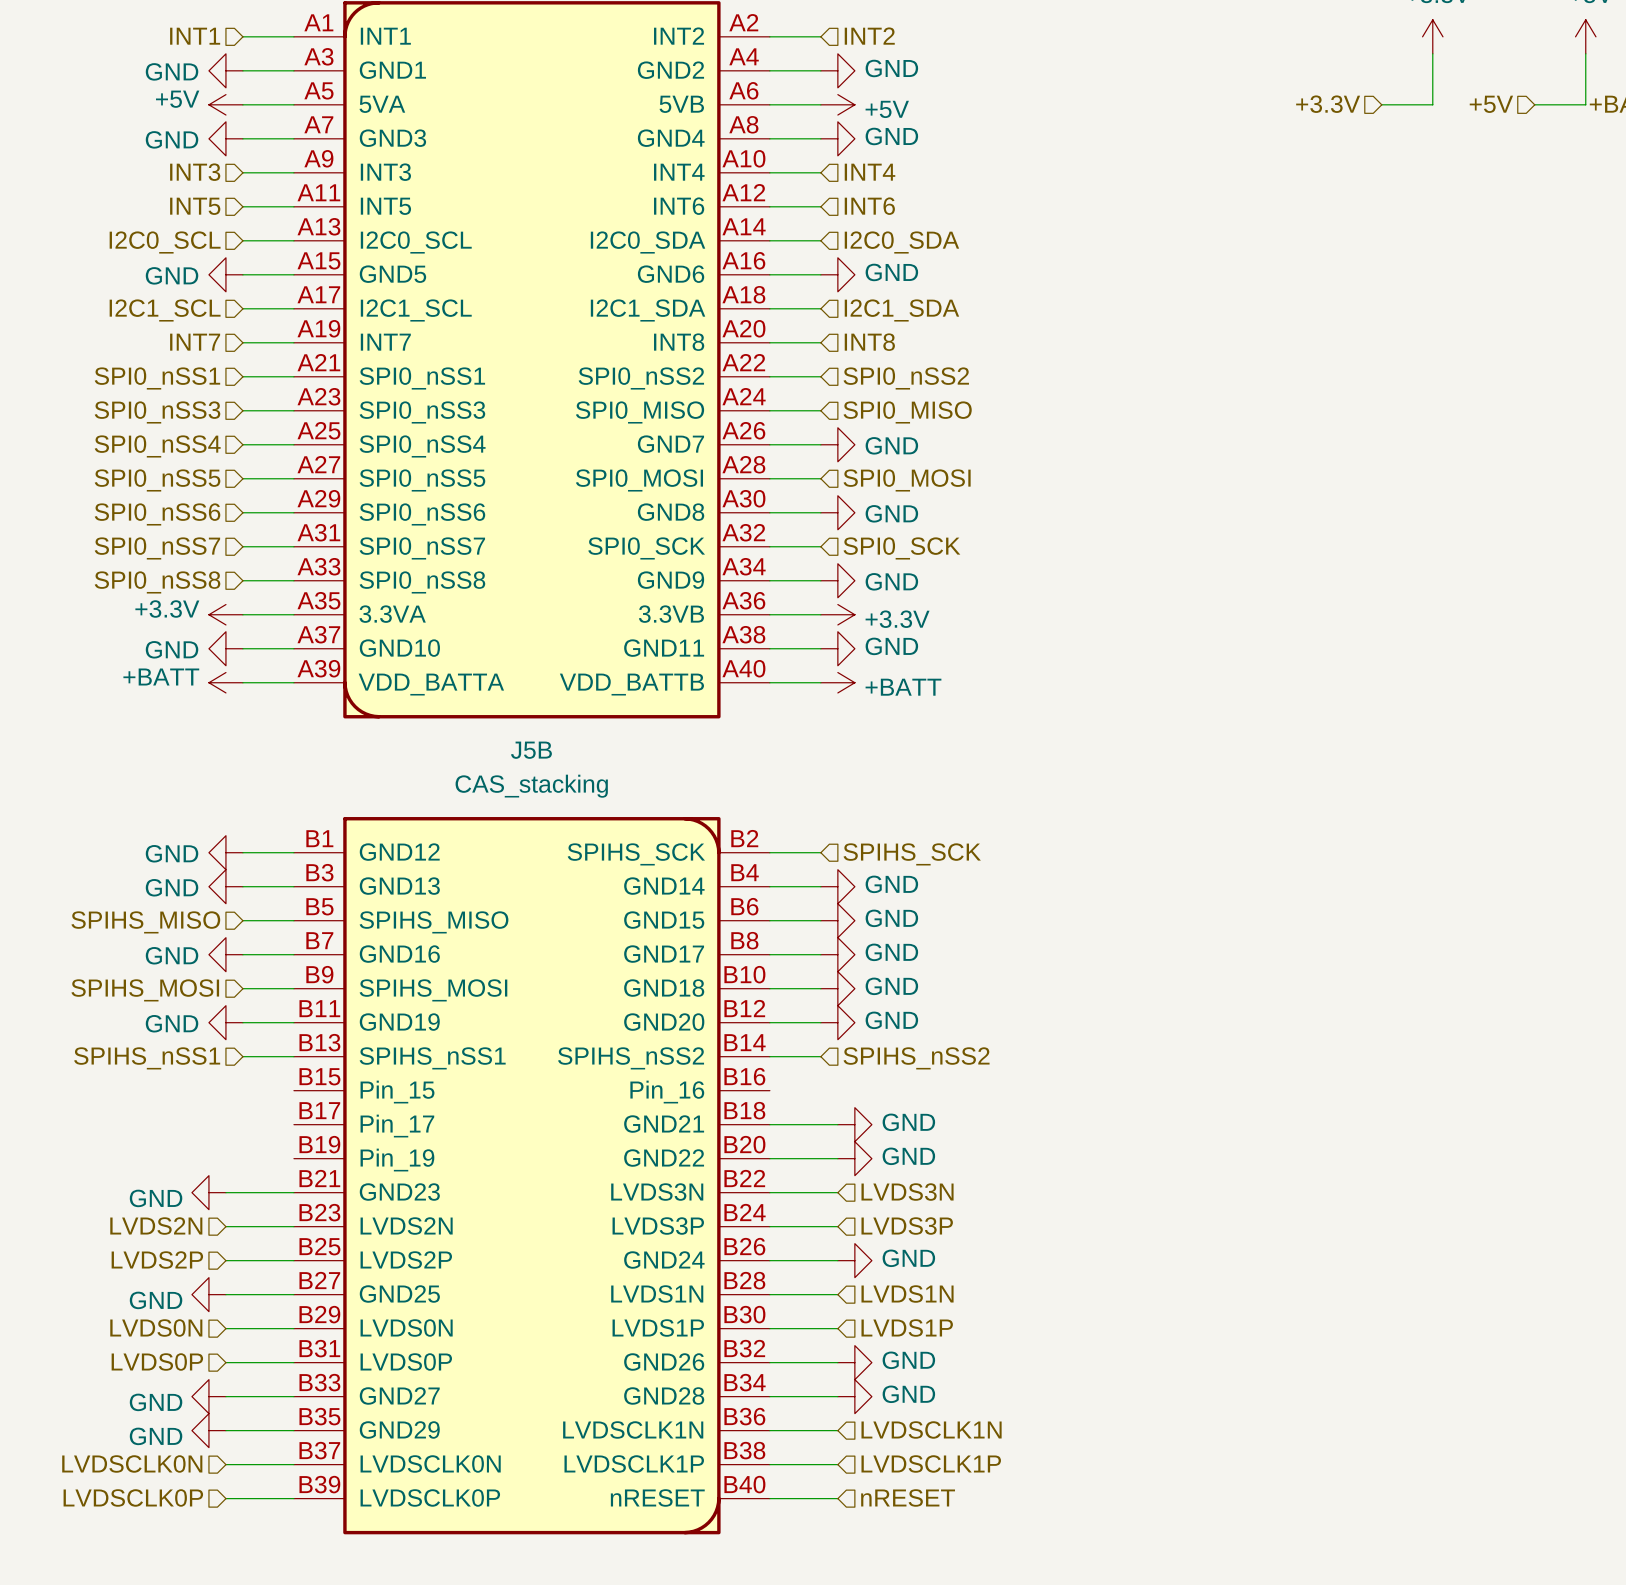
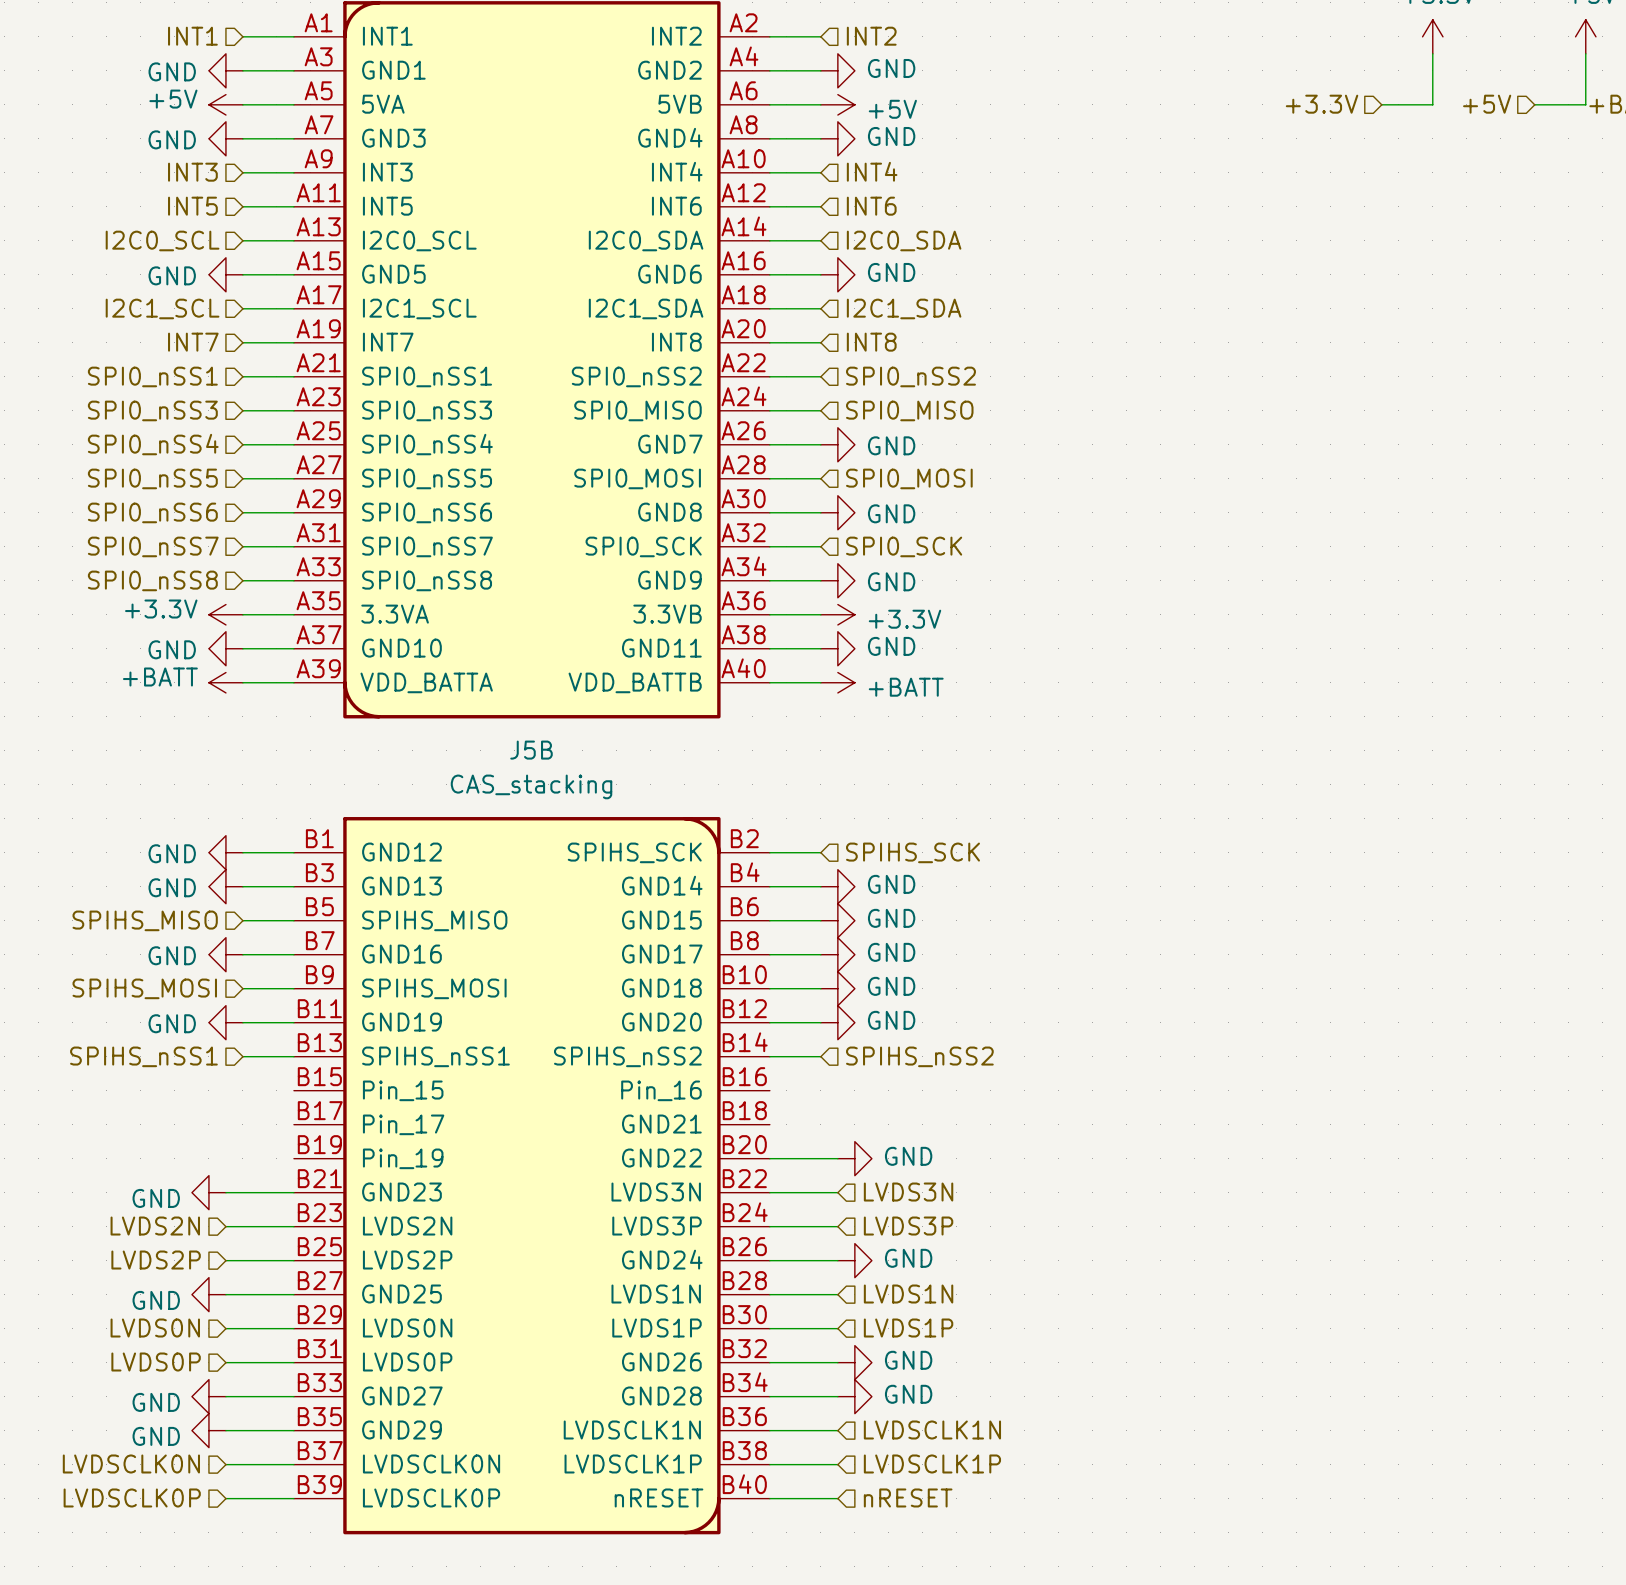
wire: (769, 1124) (837, 1124) -> none
power symbol: GND (854, 1124) -> none

